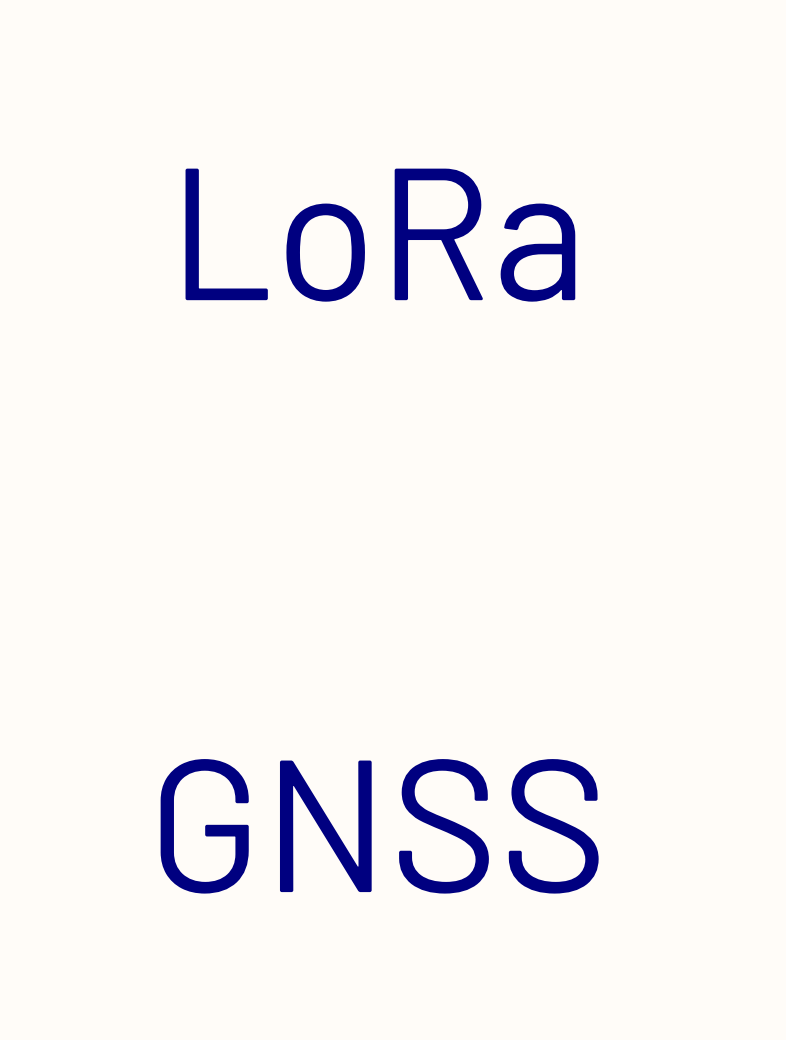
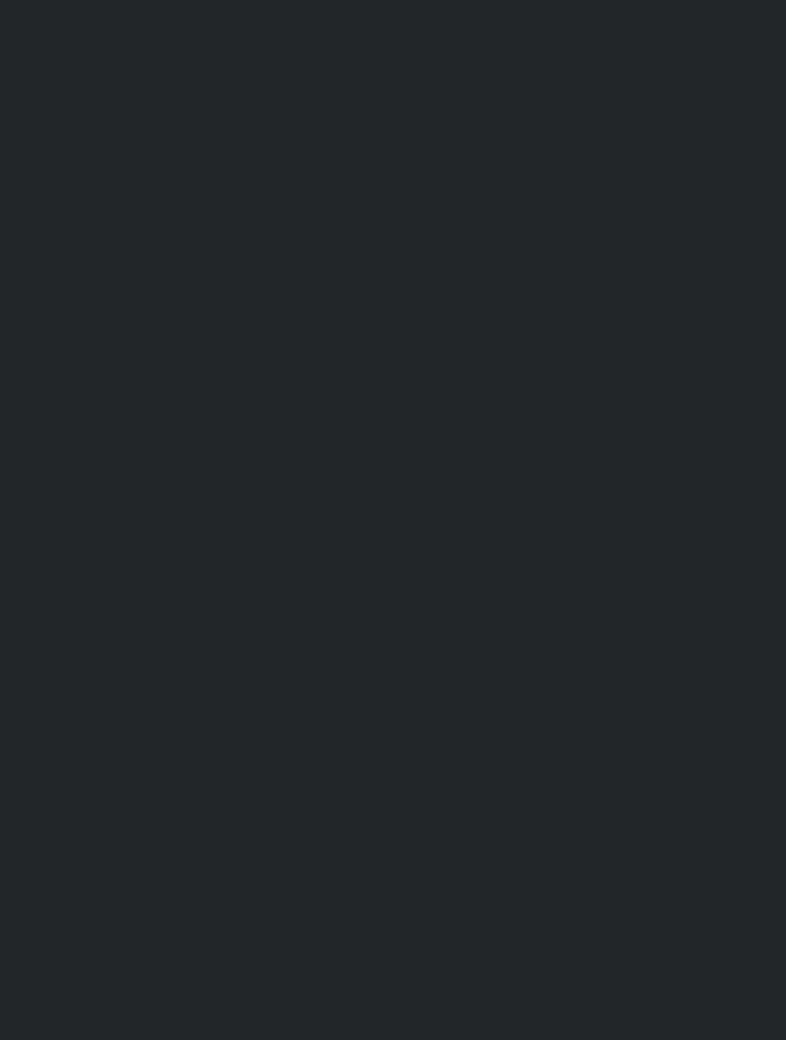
text: LoRa (380, 235) -> none
text: GNSS (379, 826) -> none

